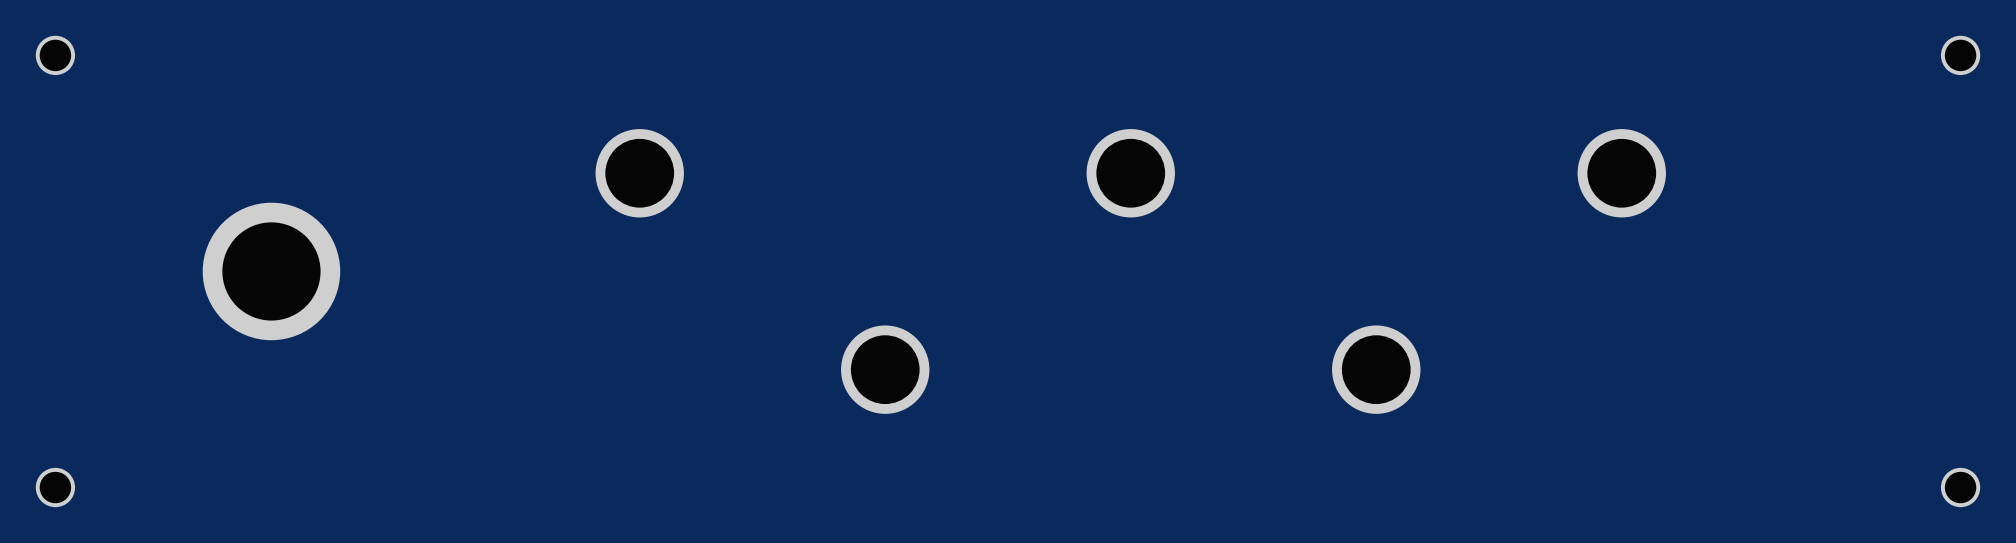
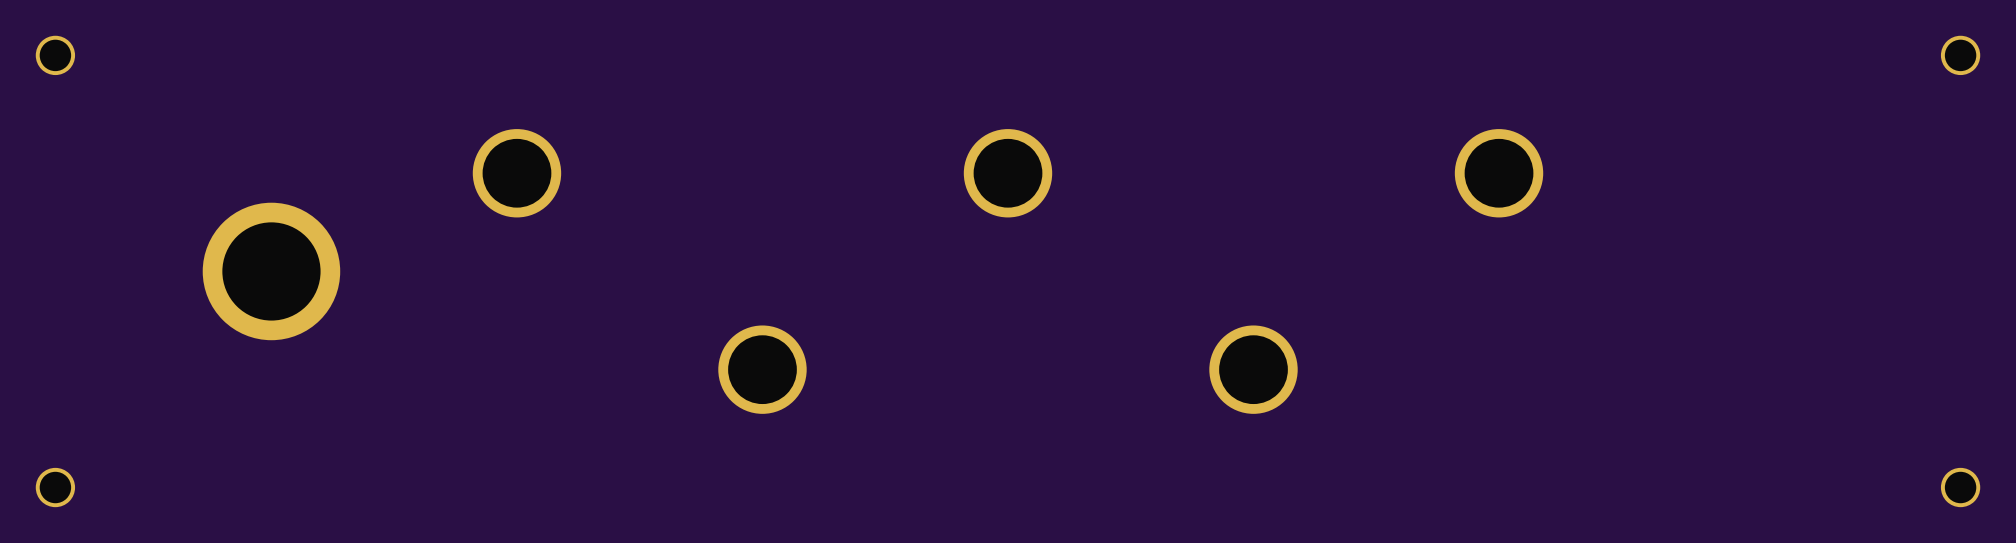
part: none -> (516, 173)
part: (639, 173) -> none
part: none -> (1007, 173)
part: (1130, 173) -> none
part: none -> (1499, 173)
part: (1621, 173) -> none
part: none -> (762, 369)
part: (885, 369) -> none
part: none -> (1253, 369)
part: (1376, 369) -> none

